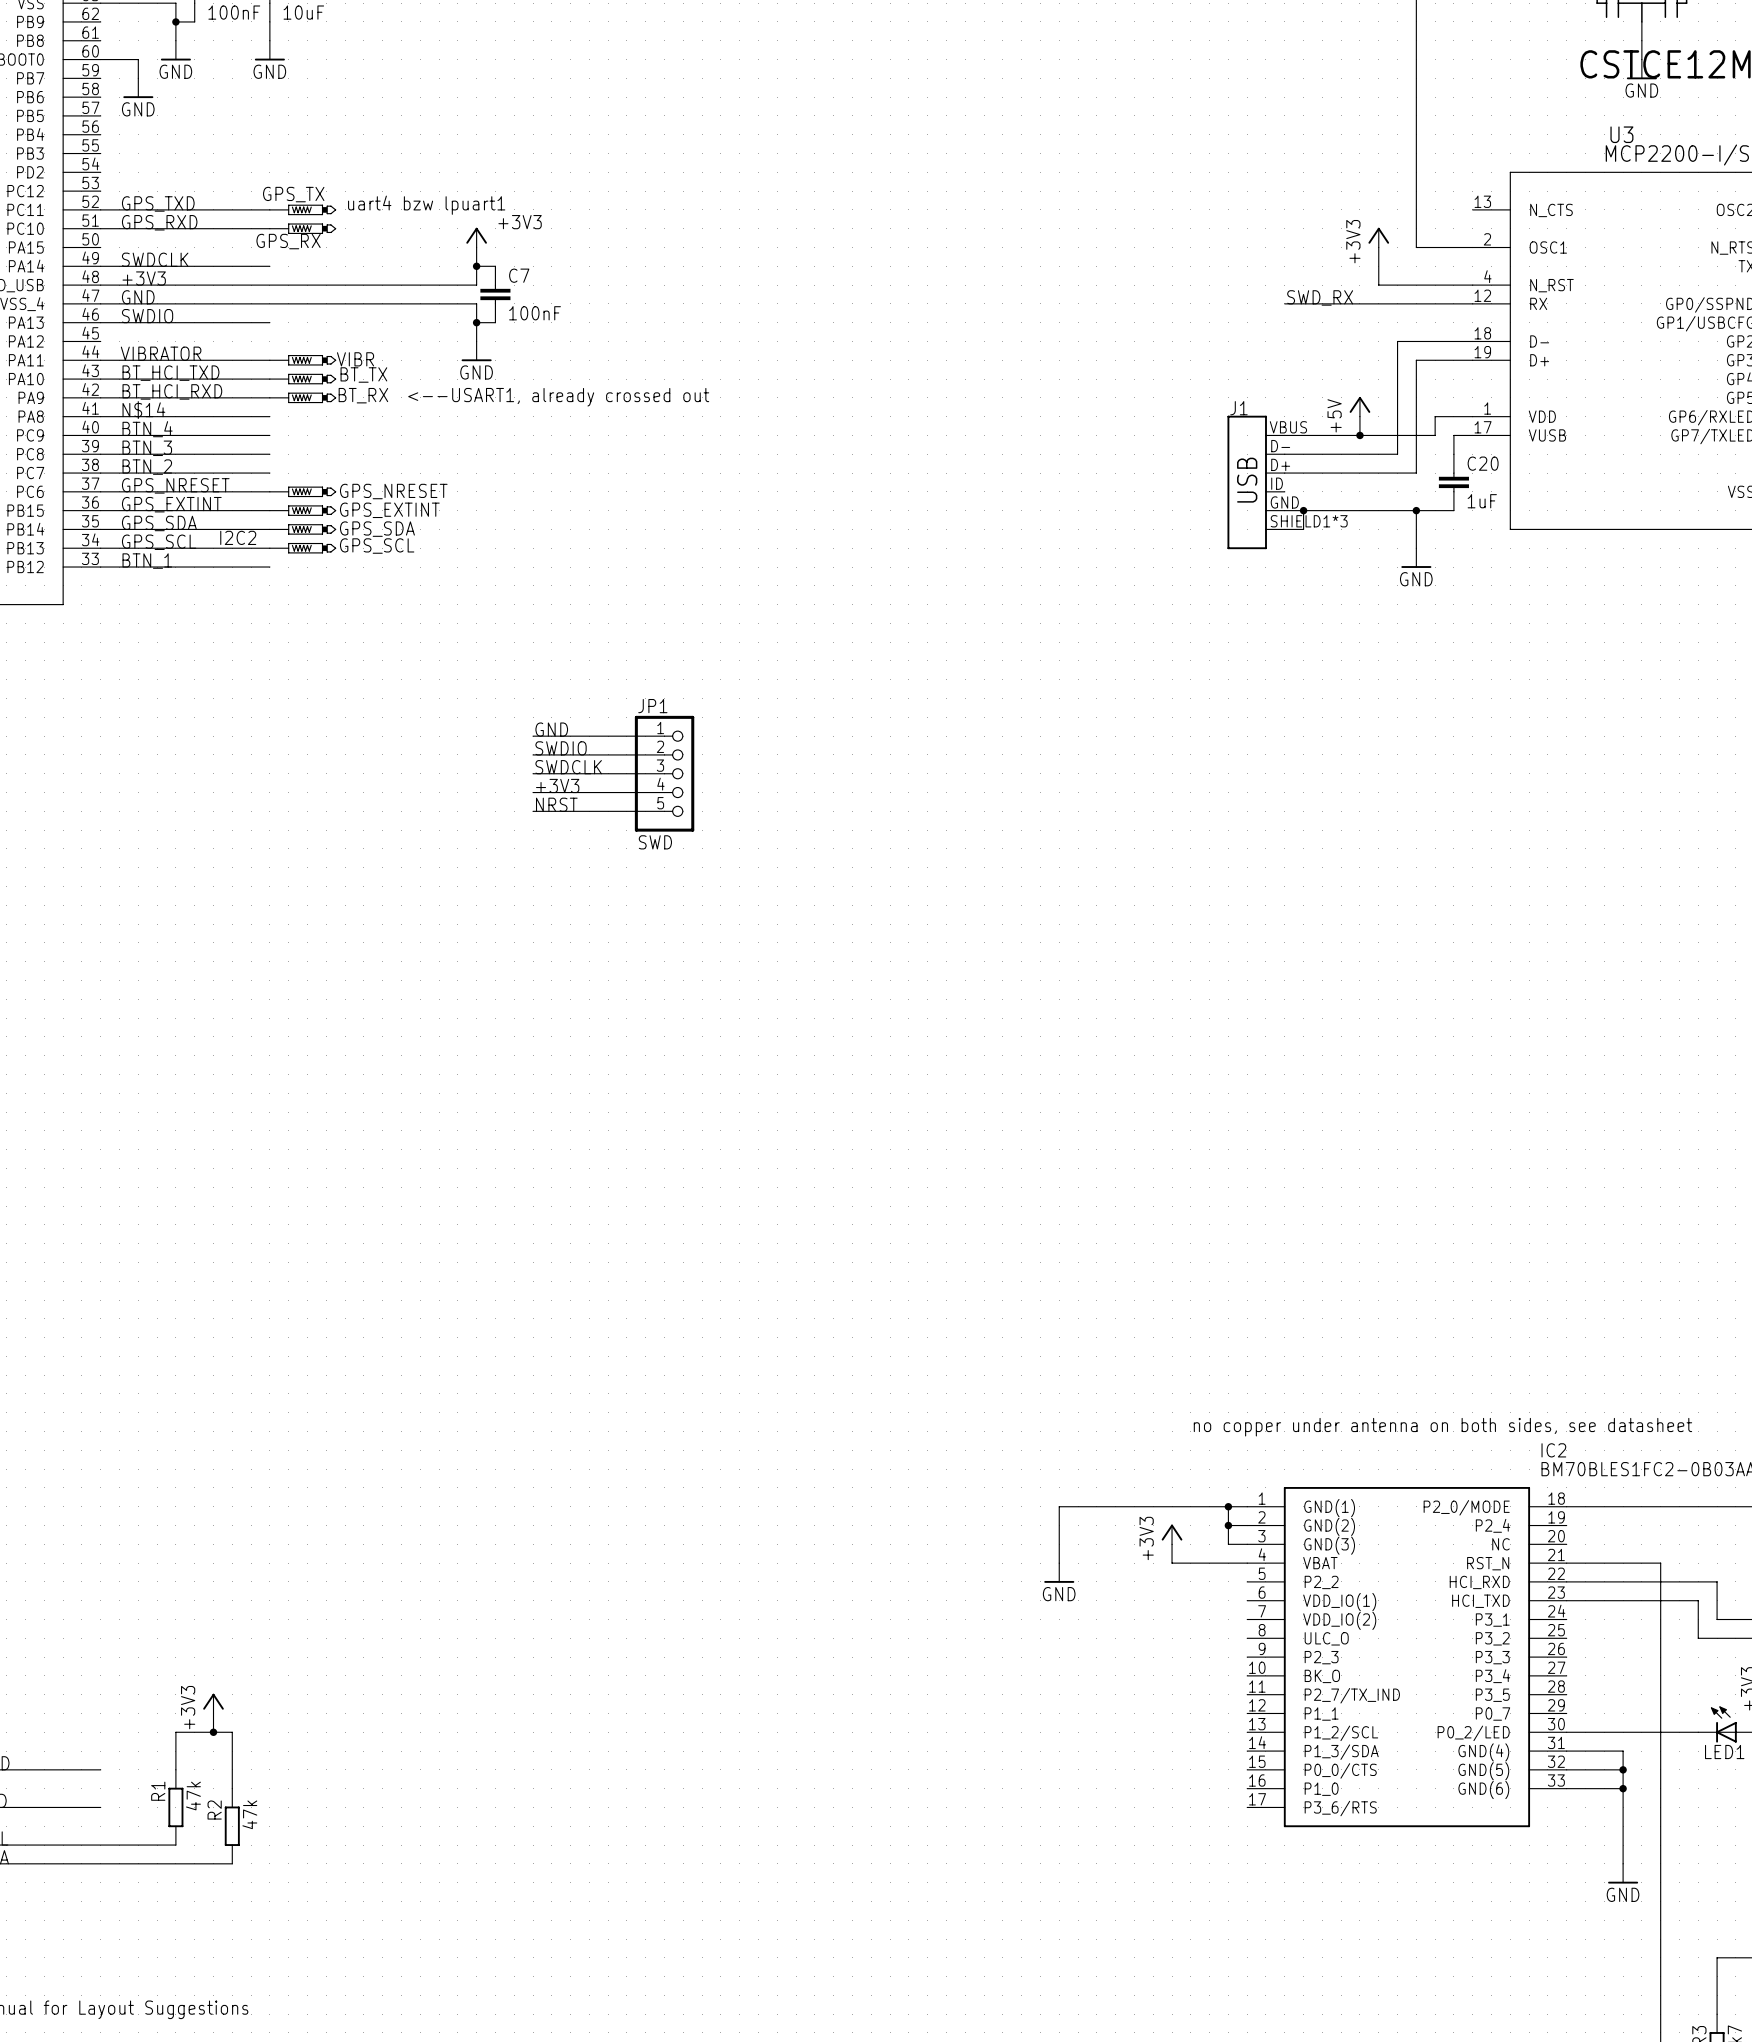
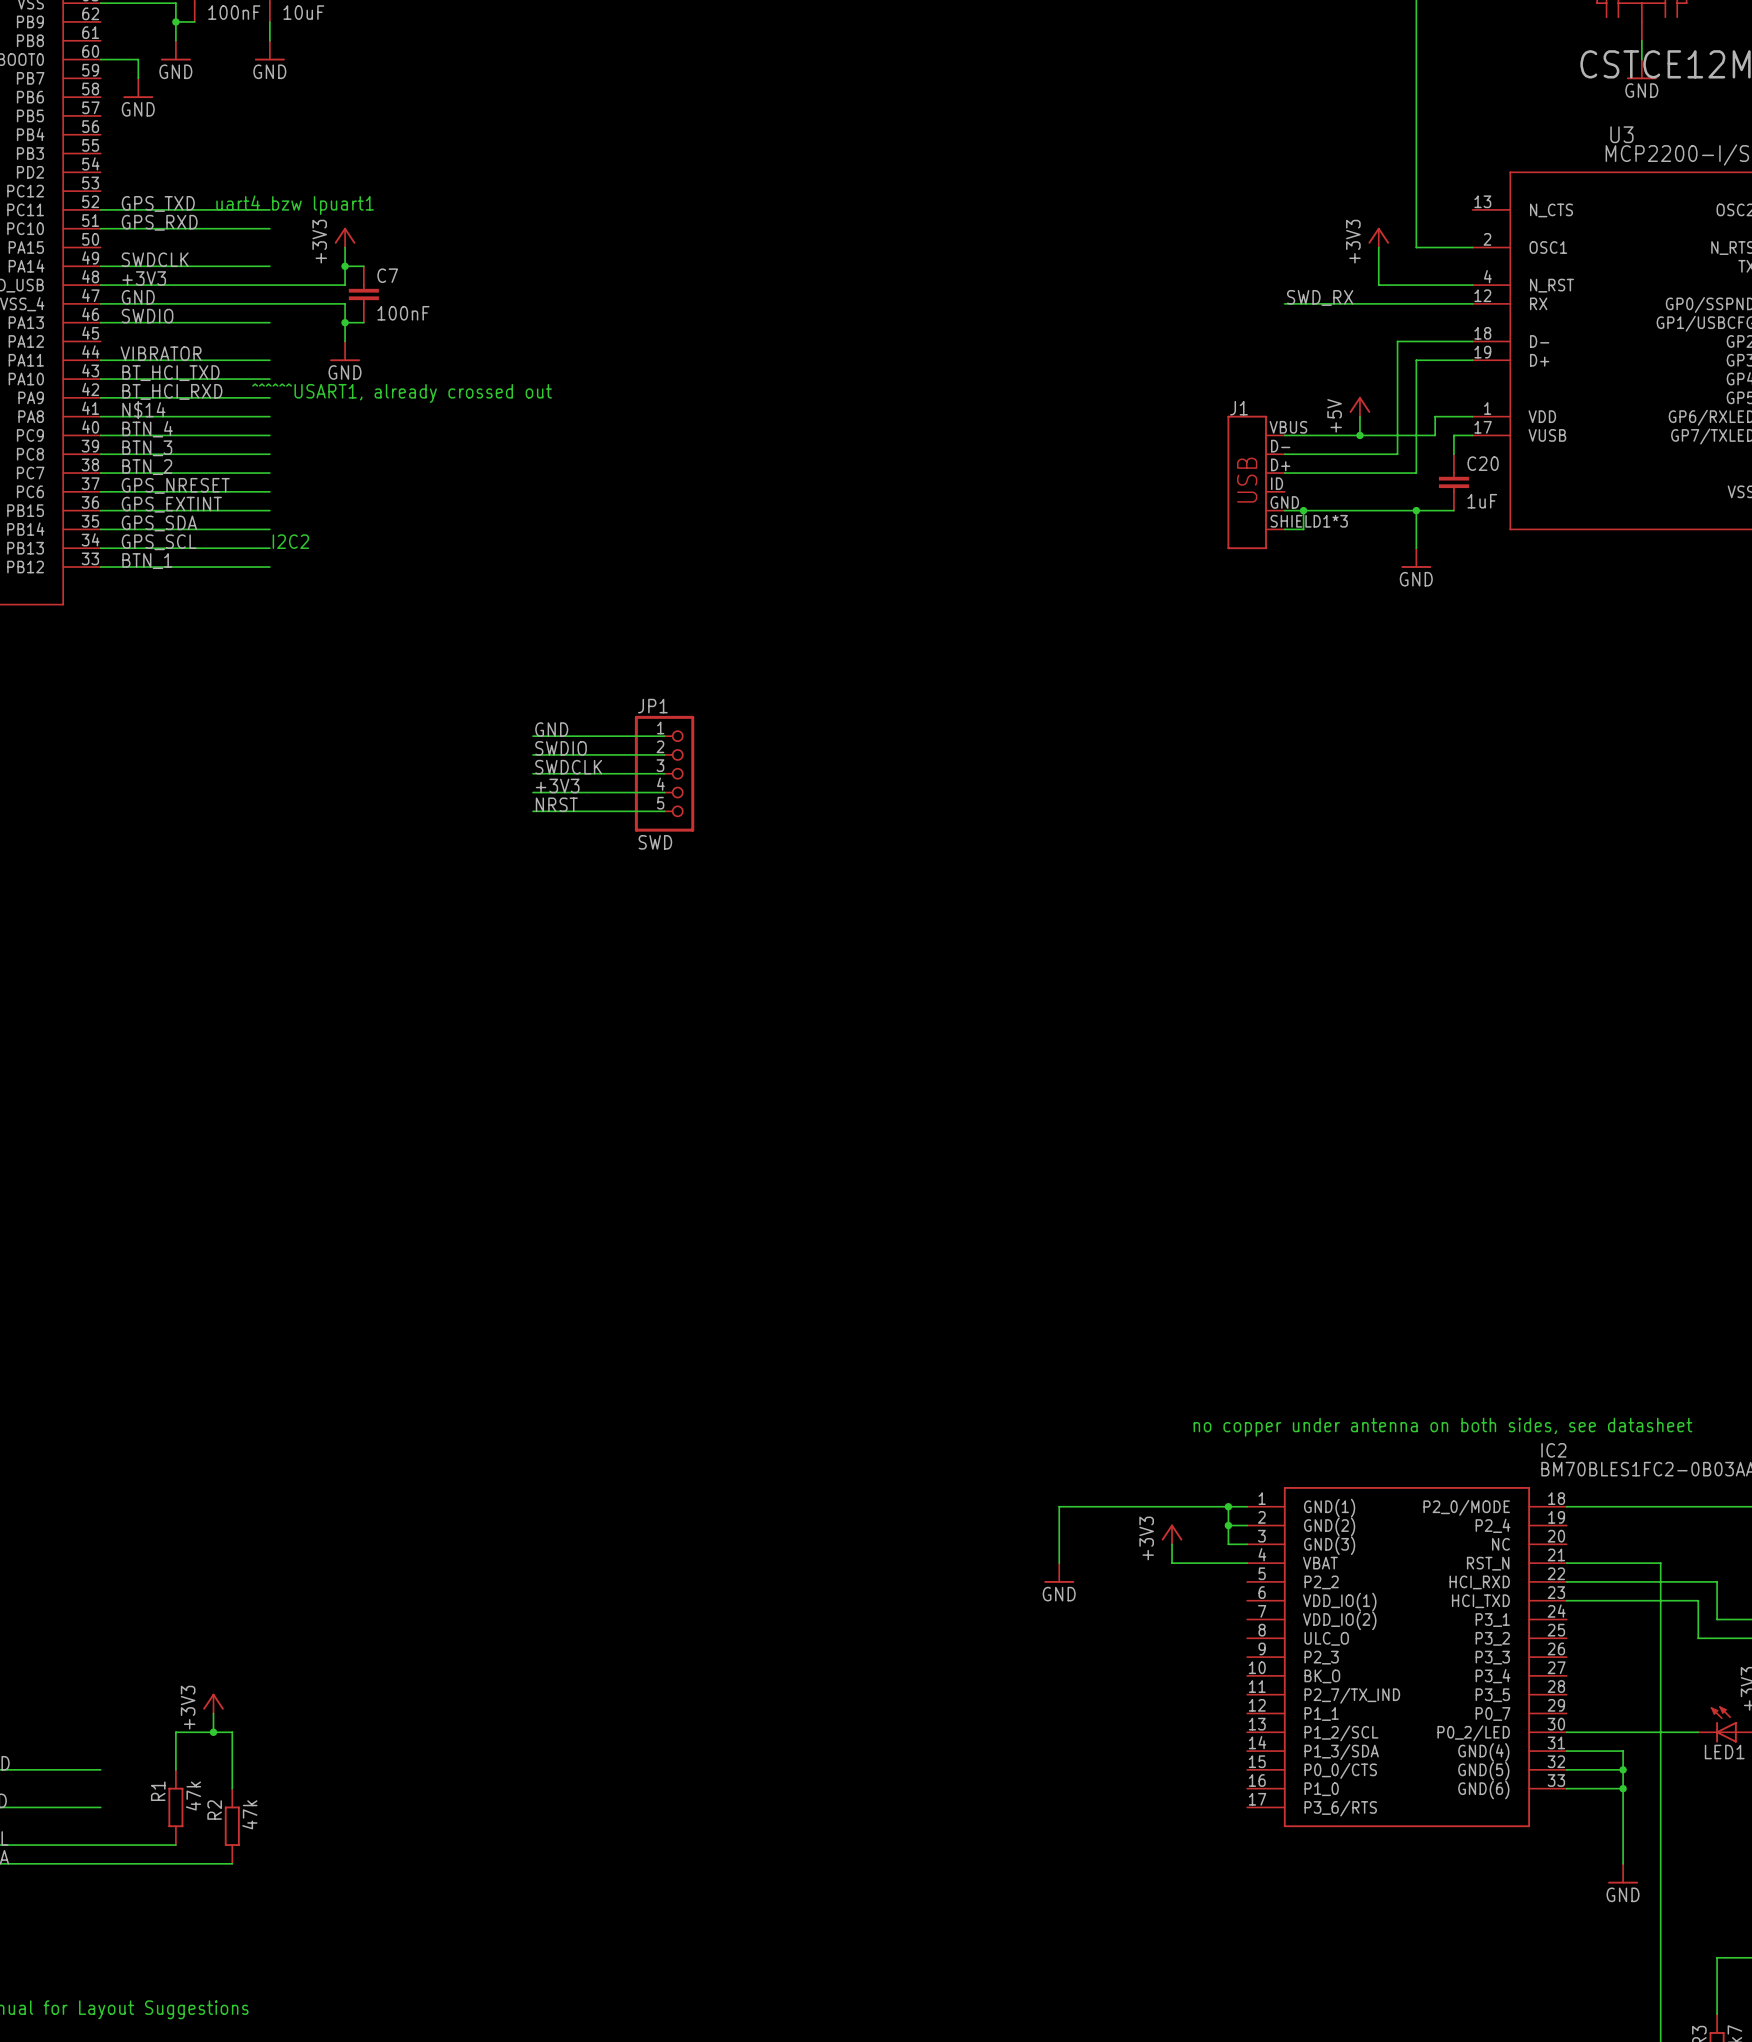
text position: uart4 bzw lpuart1 (426, 205) -> uart4 bzw lpuart1 (295, 205)
GPS_TX: (303, 209) -> none
power symbol text rotation: 0° (520, 222) -> 90° counterclockwise (319, 241)
power symbol text position: +3V3 (520, 222) -> +3V3 (319, 241)
GPS_RX: (303, 228) -> none
power symbol position: +3V3 (476, 237) -> +3V3 (345, 237)
wire: (476, 247) (476, 285) (345, 285) -> (345, 247) (345, 285)
junction: none -> (345, 266)
wire: (476, 266) (495, 266) -> (345, 266) (363, 266)
junction: (476, 266) -> none
C7 position: (495, 294) -> (363, 294)
wire: (345, 303) (476, 303) (476, 341) -> (345, 303) (345, 341)
junction: none -> (345, 322)
wire: (476, 322) (495, 322) -> (345, 322) (363, 322)
junction: (476, 322) -> none
power symbol position: GND (476, 351) -> GND (345, 351)
VIBR: (303, 360) -> none
BT_TX: (303, 379) -> none
BT_RX: (303, 397) -> none
text: <--USART1, already crossed out (558, 397) -> ^^^^^^USART1, already crossed out (402, 393)
GPS_NRESET: (303, 491) -> none
GPS_EXTINT: (303, 510) -> none
GPS_SDA: (303, 529) -> none
text position: I2C2 (238, 537) -> I2C2 (290, 541)
GPS_SCL: (303, 548) -> none

